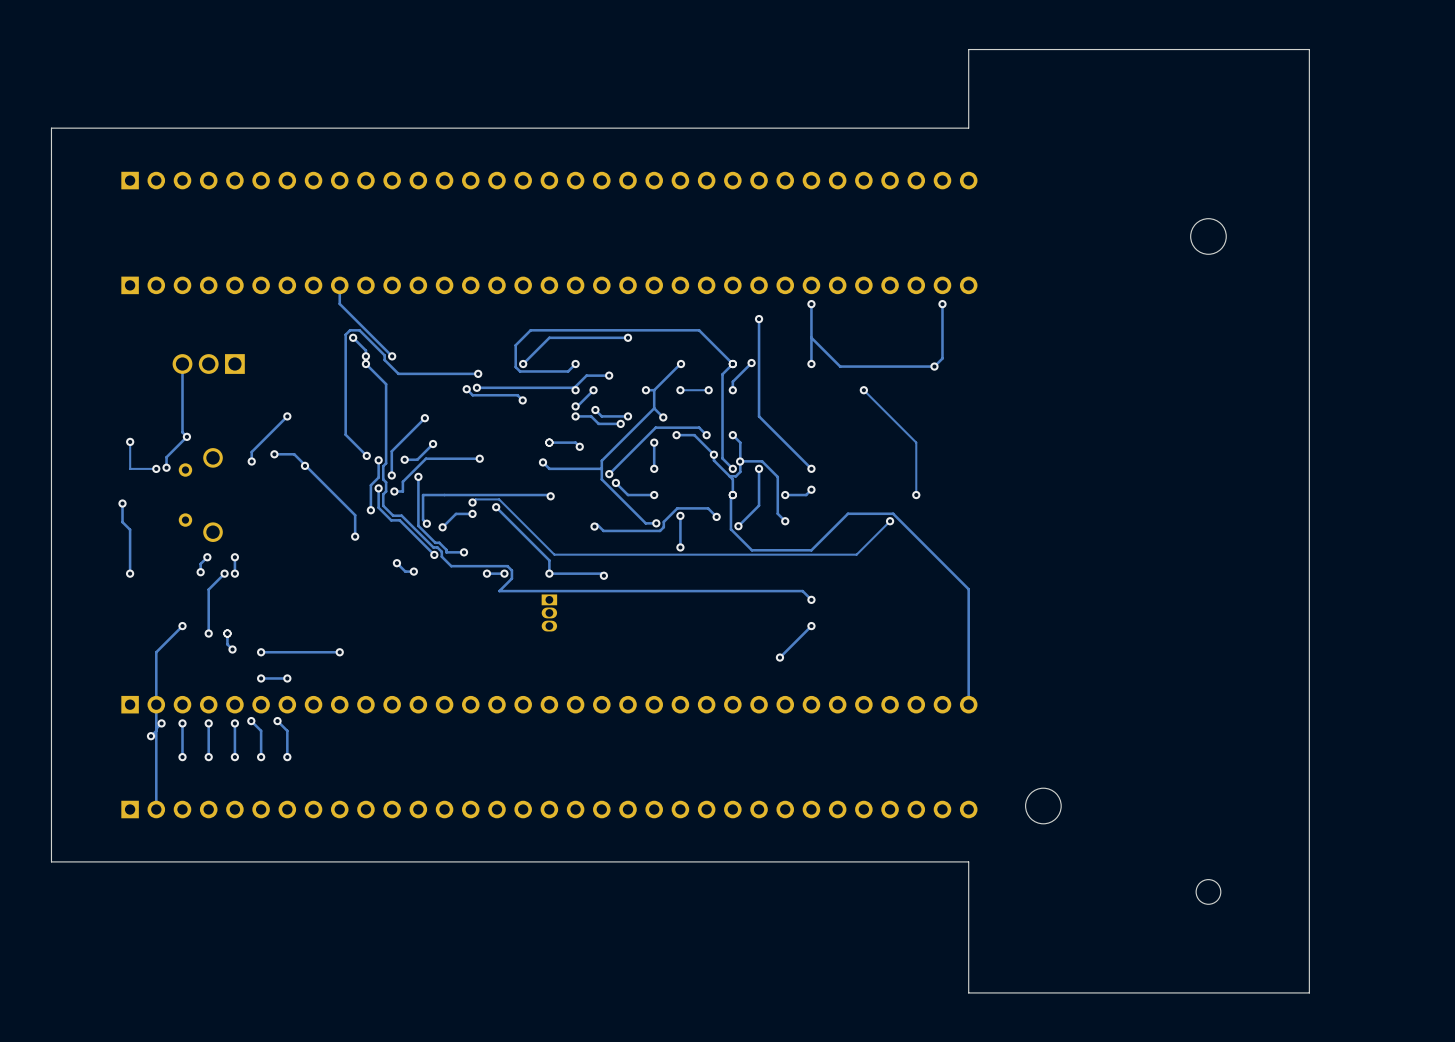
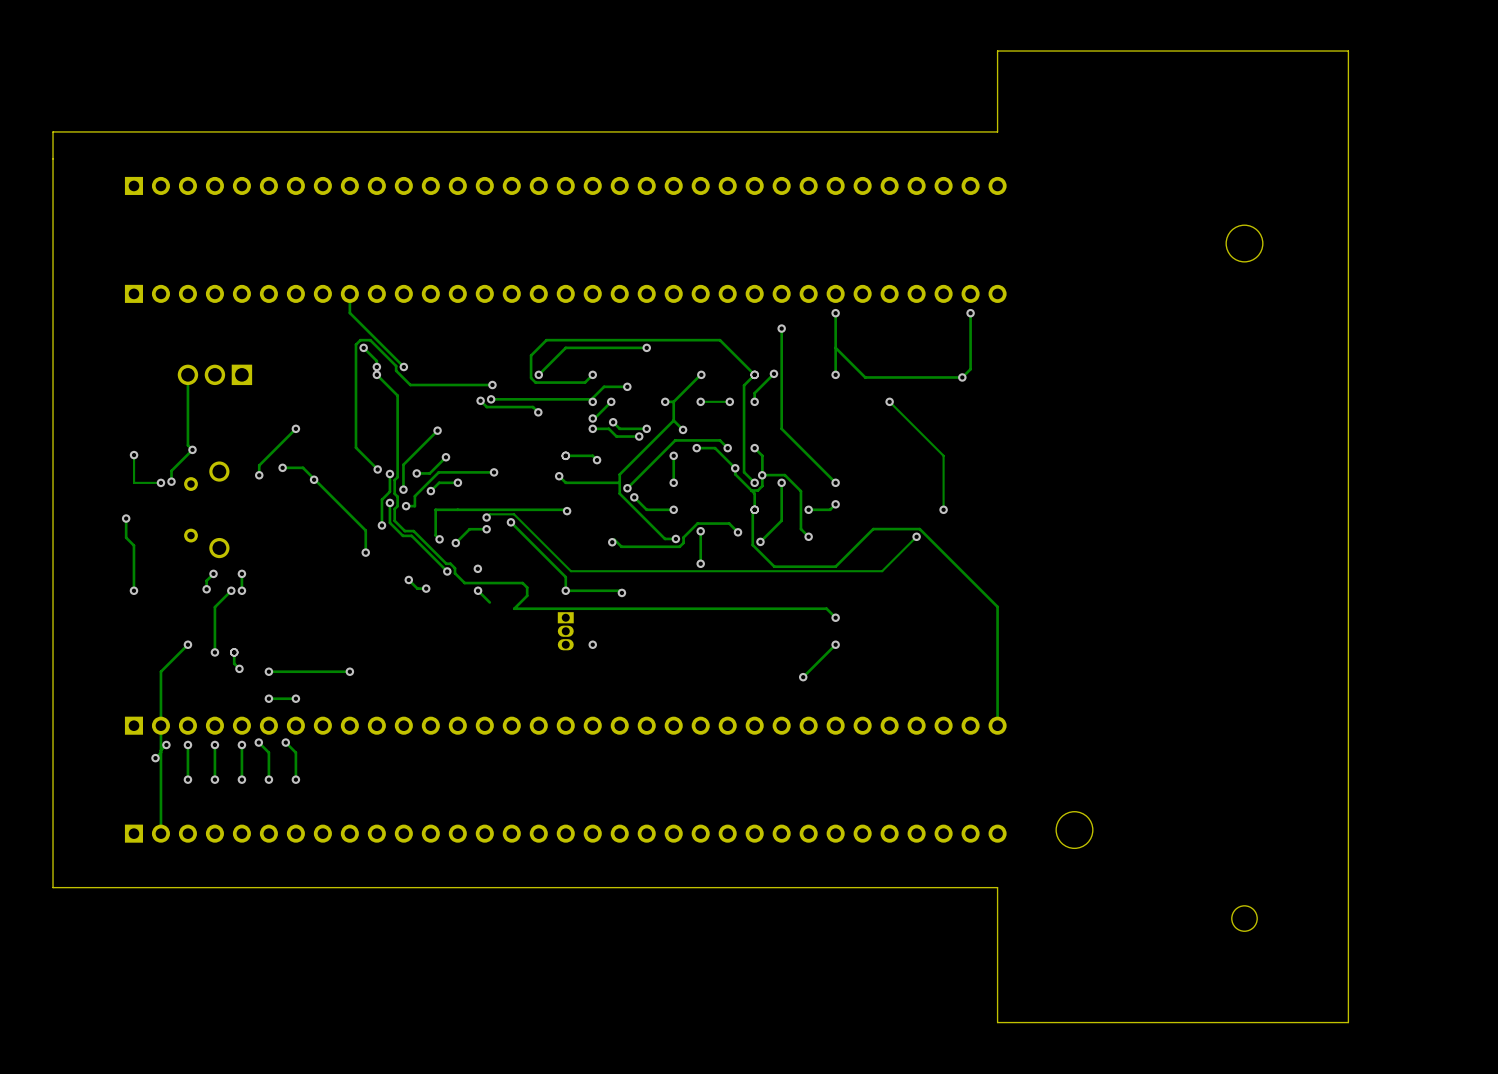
via: none -> (457, 482)
track: (418, 476) (418, 525) (435, 542) (439, 542) (446, 552) (464, 552) -> (430, 491) (439, 482) (457, 482)
track: none -> (478, 590) (489, 602)
via: none -> (478, 590)
via: (486, 573) -> none
track: (504, 573) (486, 573) -> none
via: (504, 573) -> none
via: none -> (592, 644)

